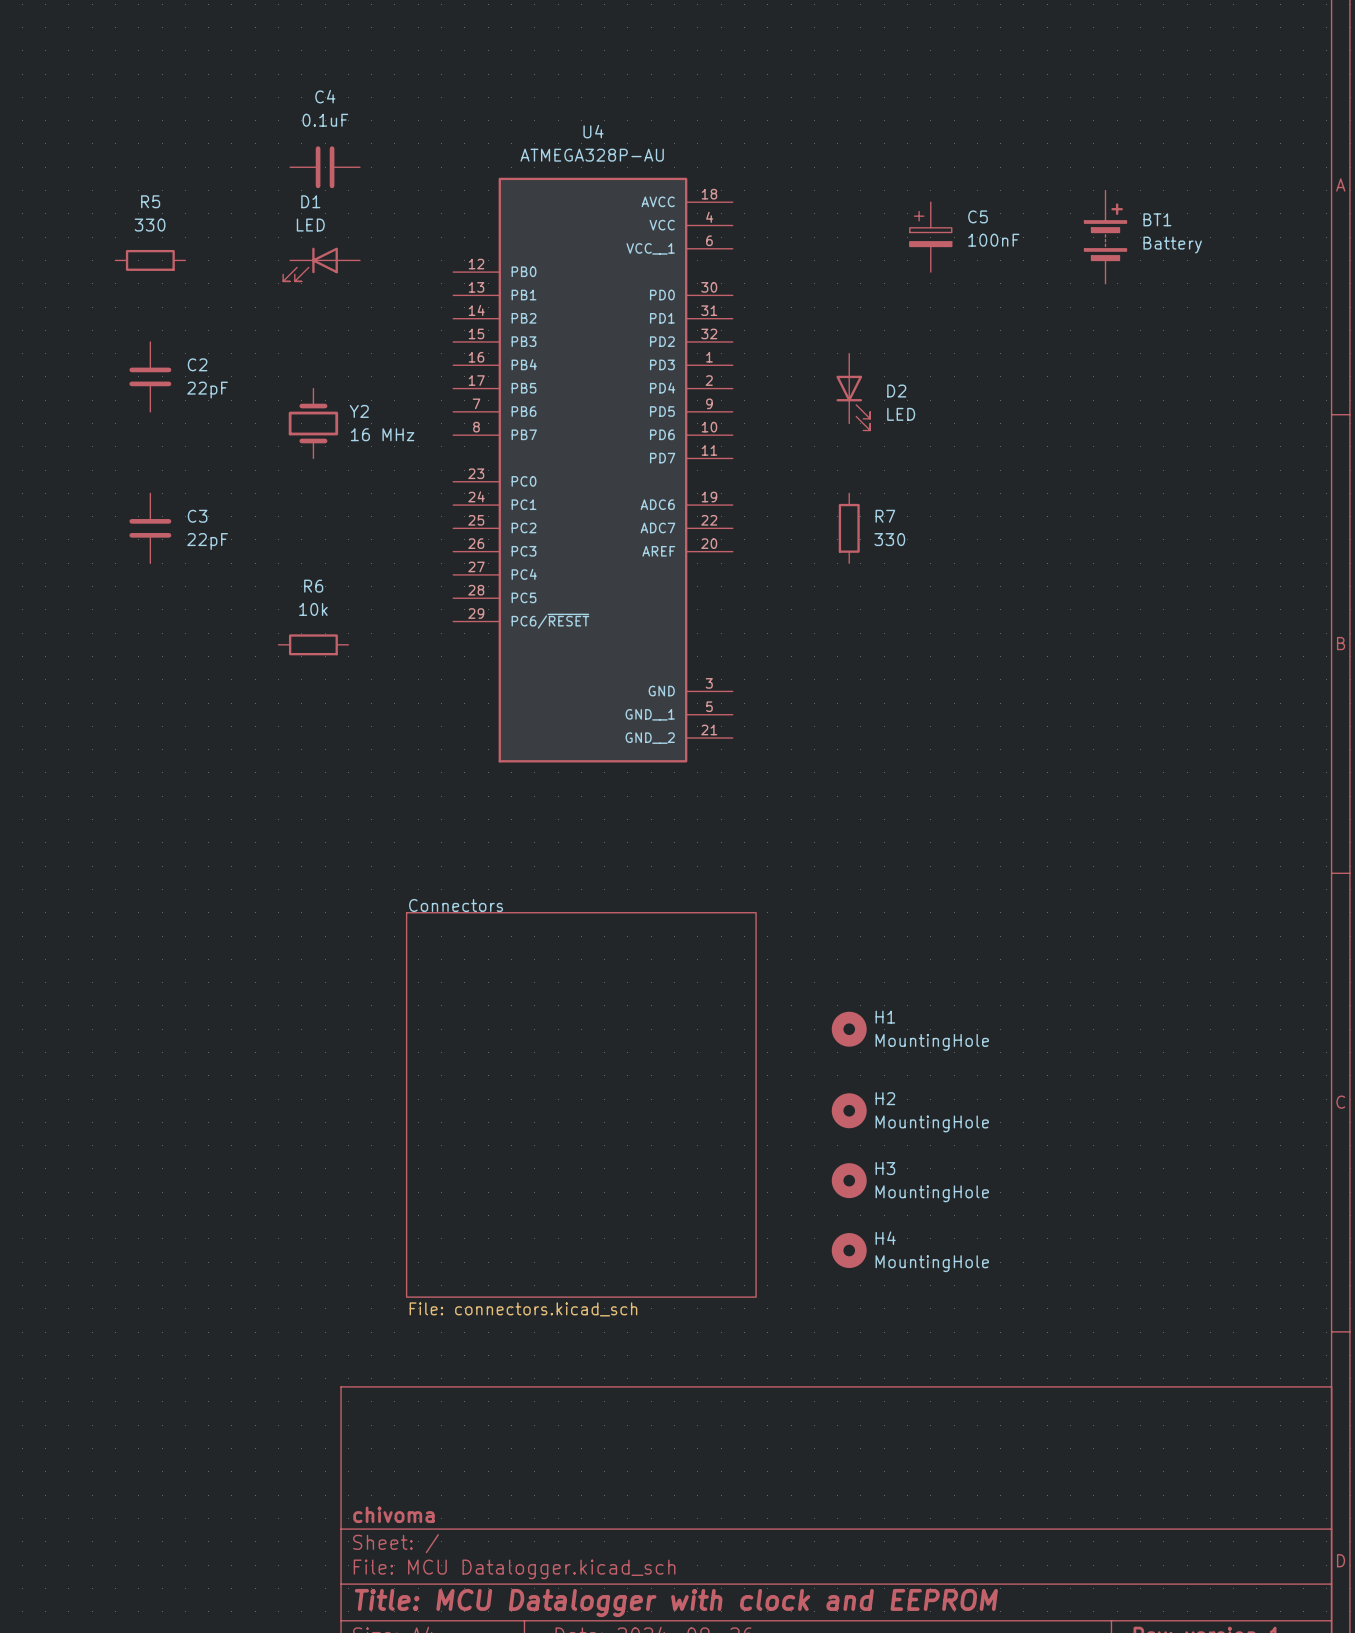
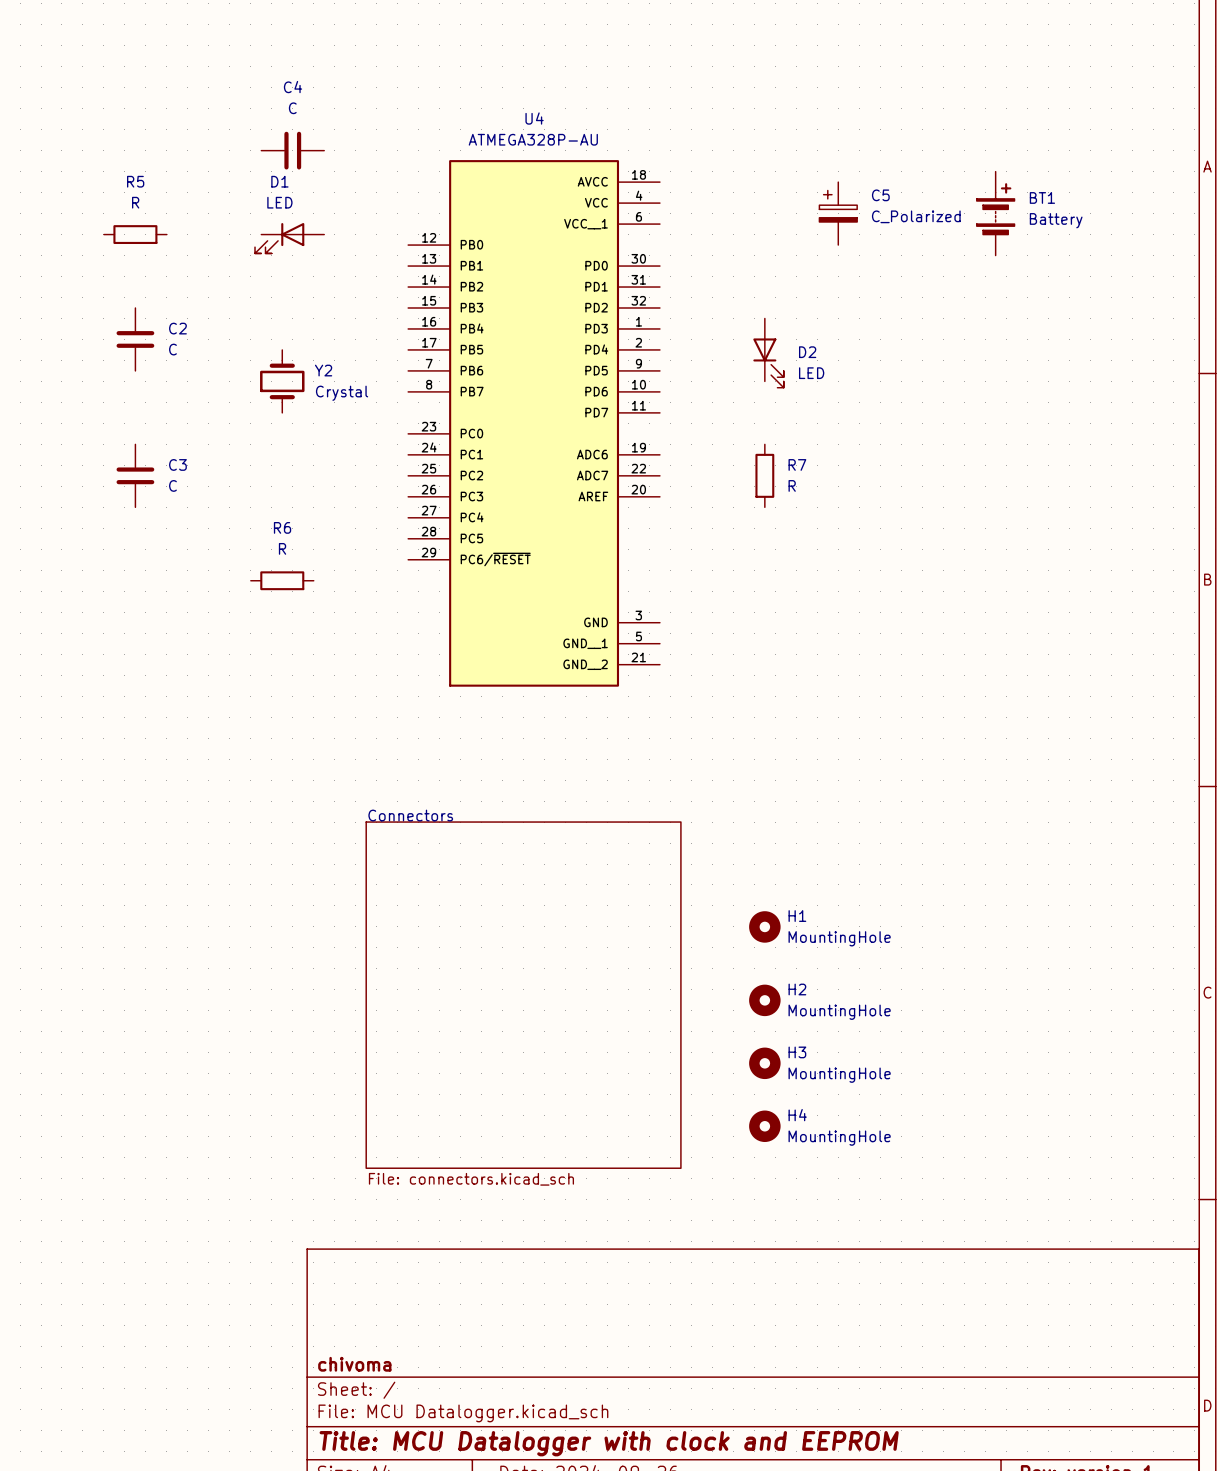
C4 value: 0.1uF (325, 120) -> C (292, 108)
R5 value: 330 (150, 225) -> R (135, 202)
C5 value: 100nF (993, 240) -> C_Polarized (916, 216)
C2 value: 22pF (207, 390) -> C (172, 349)
Y2 value: 16 MHz (382, 434) -> Crystal (342, 393)
R7 value: 330 (889, 539) -> R (792, 485)
C3 value: 22pF (207, 541) -> C (172, 485)
R6 value: 10k (313, 609) -> R (282, 548)

